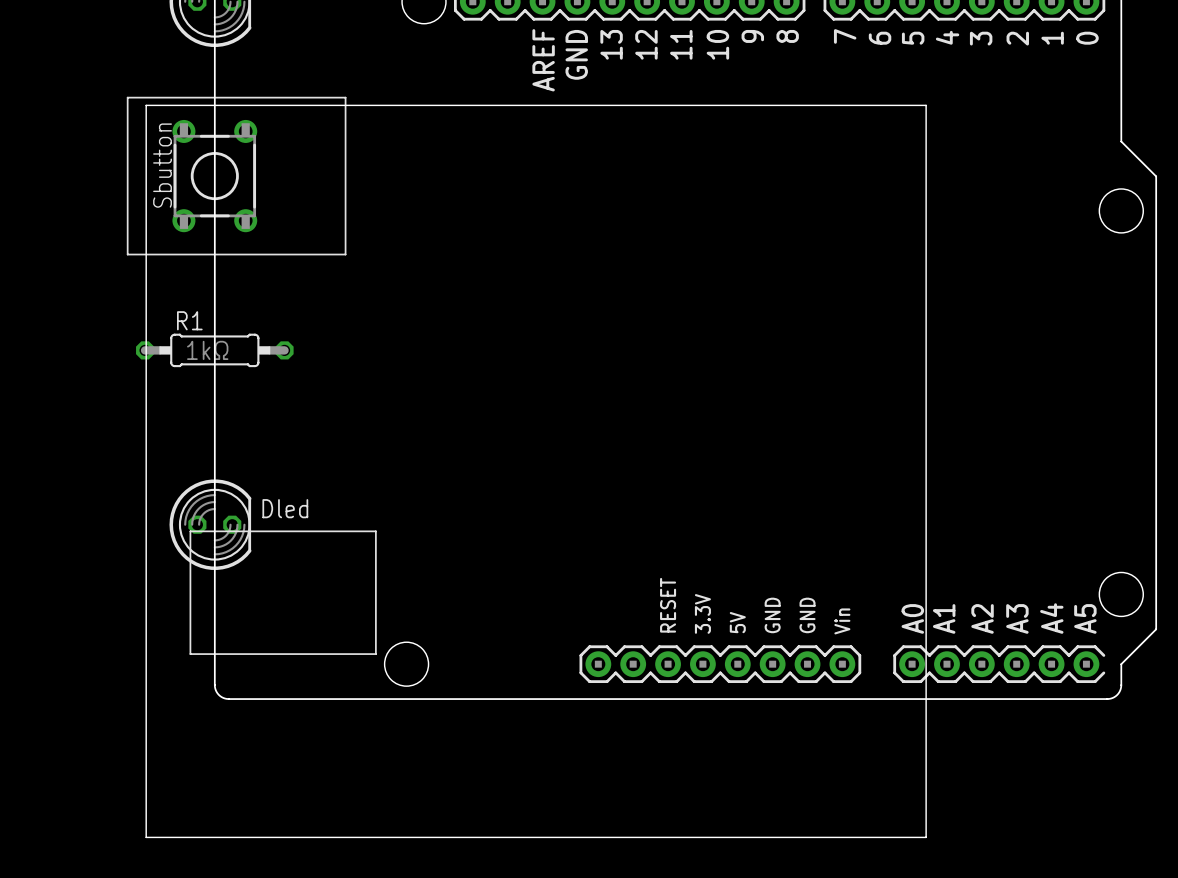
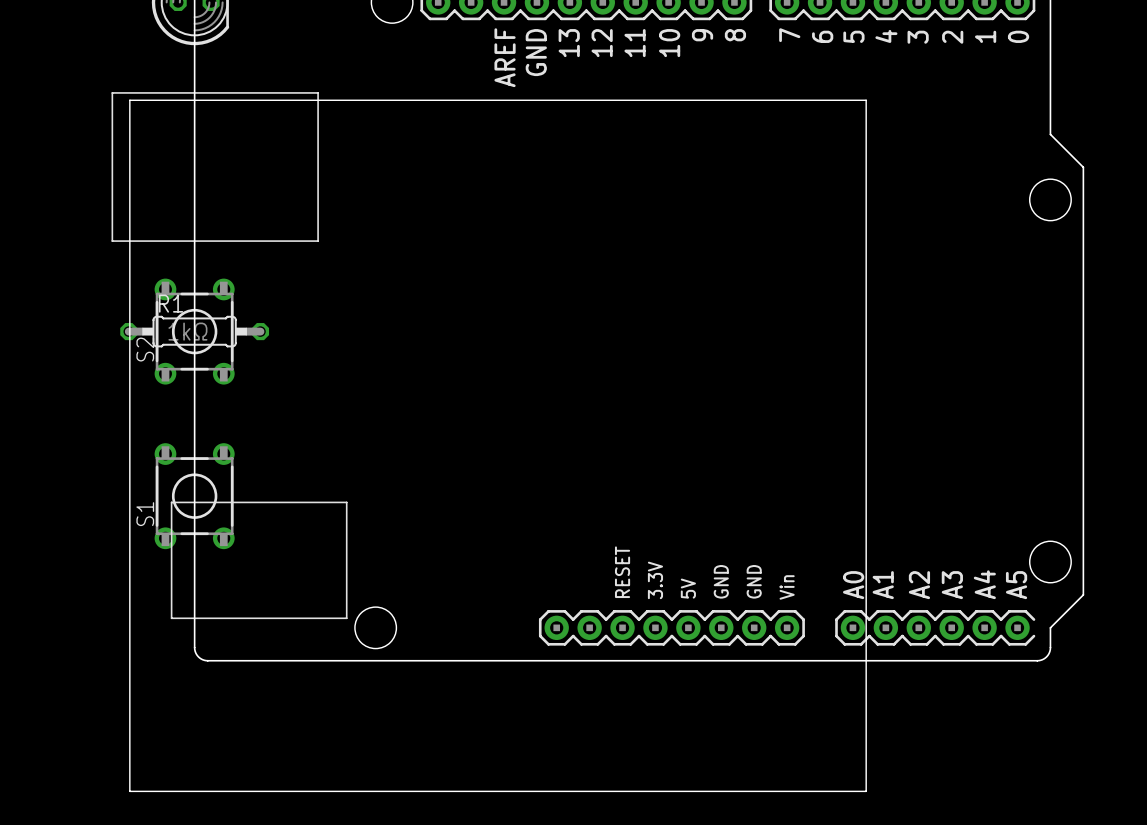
Sbutton: (214, 176) -> none
S2: none -> (194, 331)
Dled: (210, 524) -> none
S1: none -> (194, 496)

